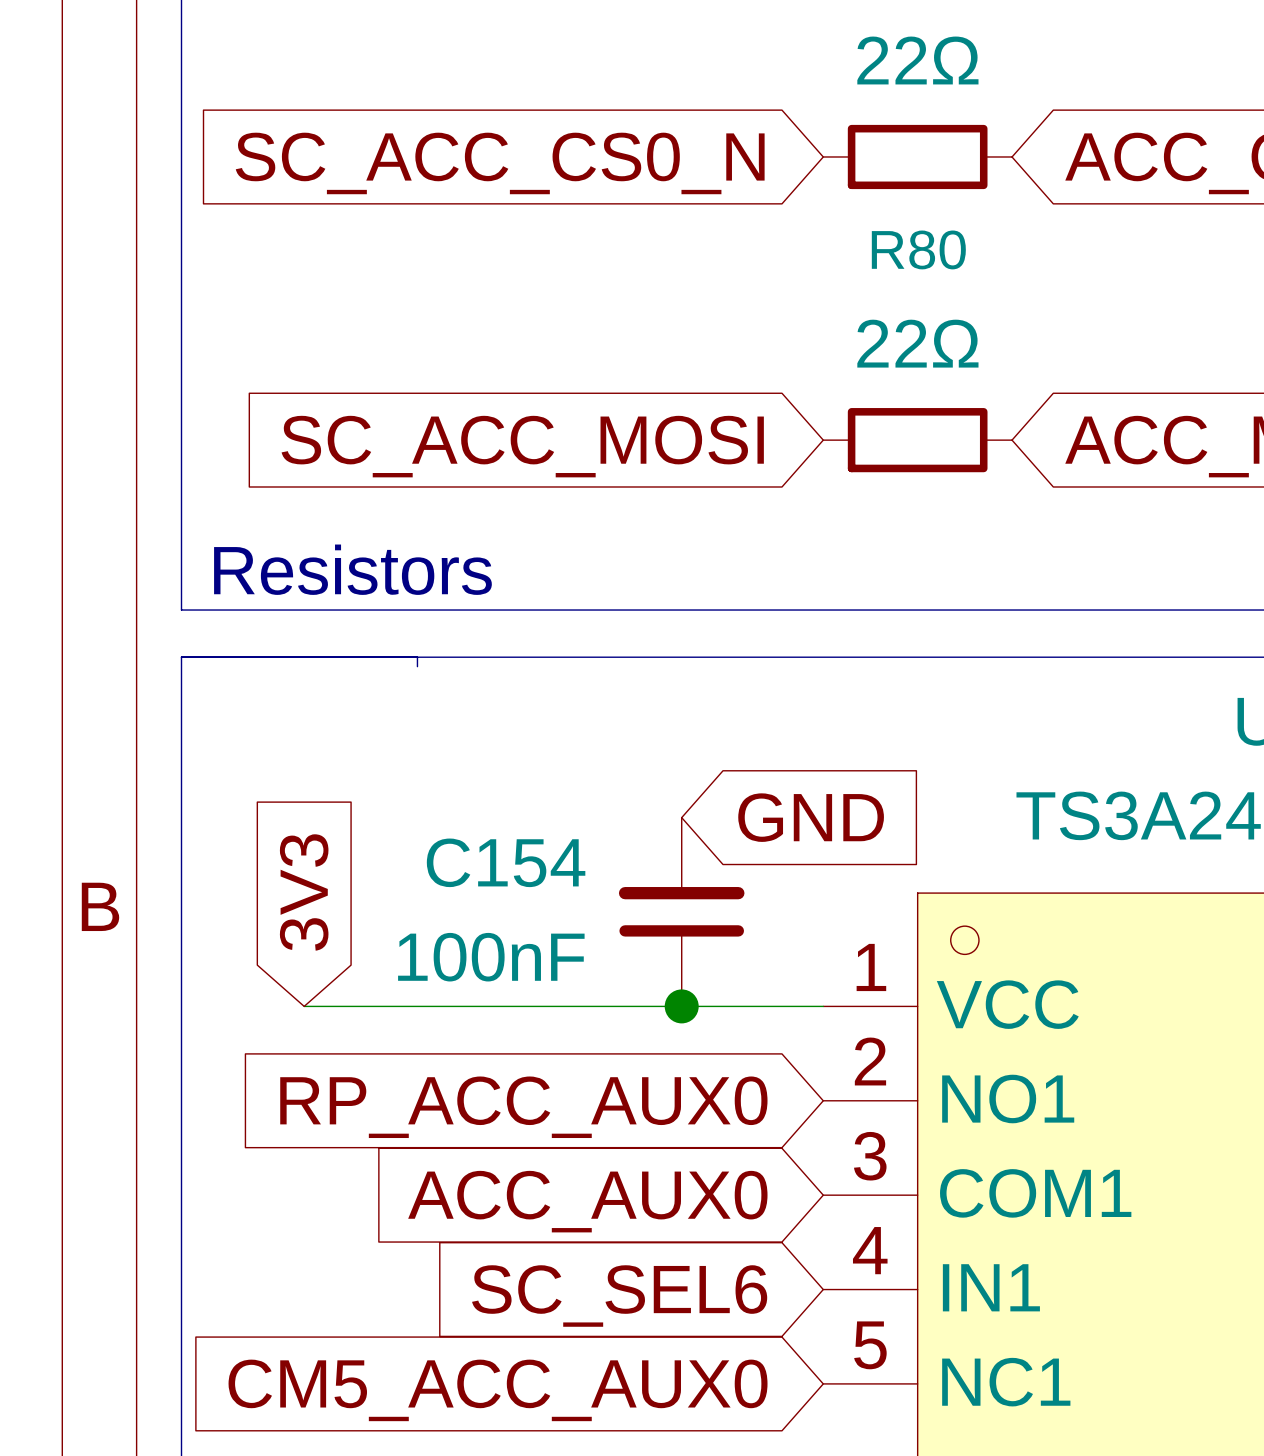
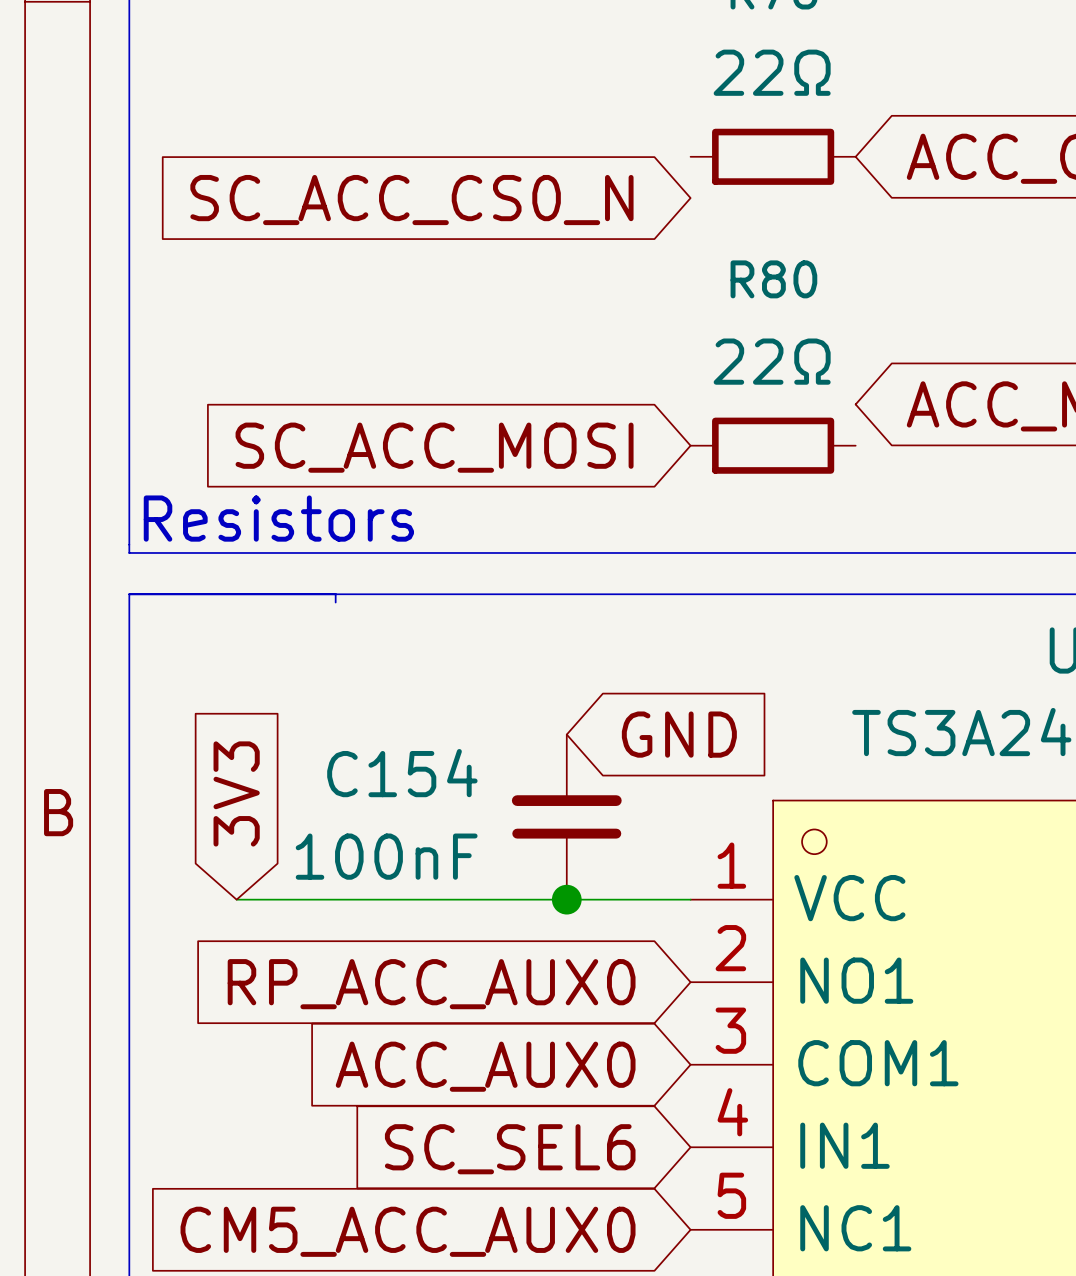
global label position: SC_ACC_CS0_N (500, 163) -> SC_ACC_CS0_N (411, 200)
R80 position: (917, 440) -> (773, 445)
global label position: SC_ACC_MOSI (522, 446) -> SC_ACC_MOSI (434, 447)

